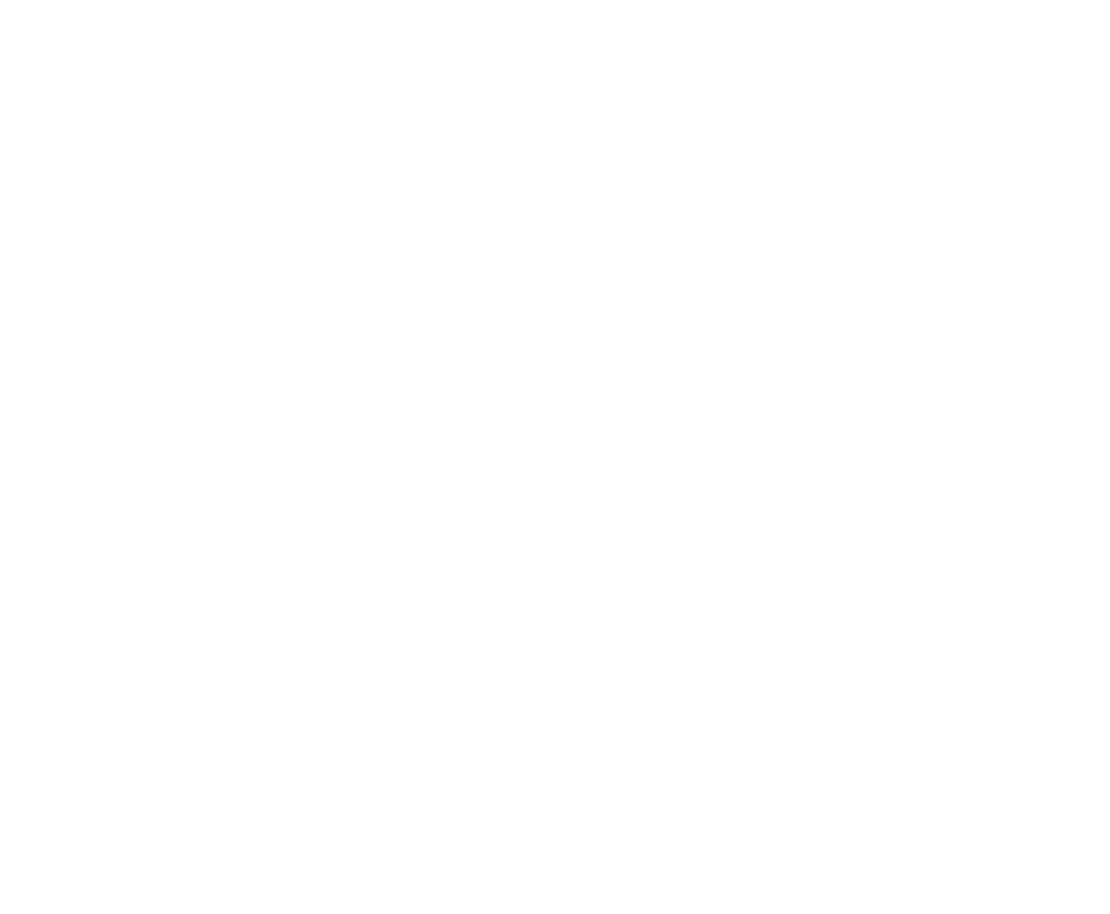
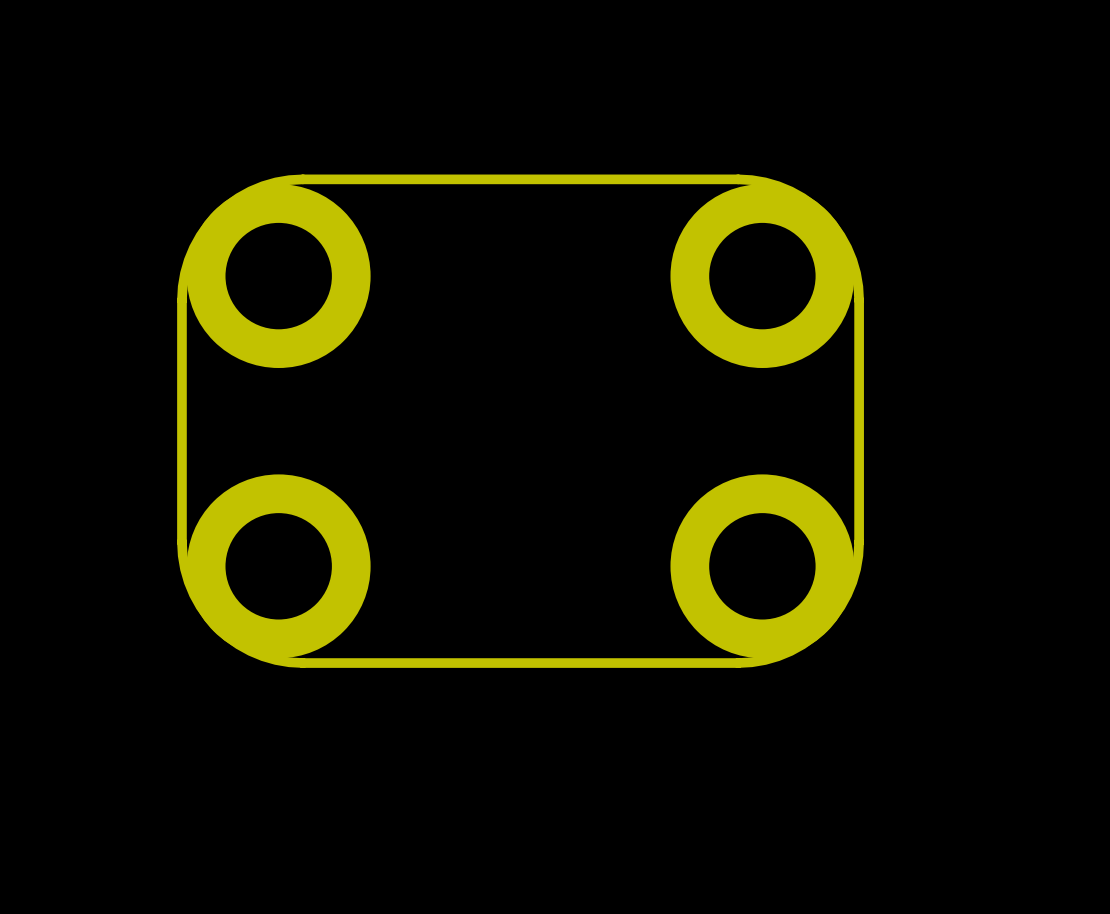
board edge: none -> (738, 179) (302, 179) (275, 182) (262, 186) (238, 197) (227, 205) (208, 224) (193, 247) (184, 273) (181, 300) (182, 555) (184, 569) (193, 594) (208, 617) (227, 636) (250, 651) (275, 660) (302, 663) (738, 663) (765, 660) (778, 656) (802, 644) (813, 636) (832, 617) (840, 606) (852, 582) (858, 555) (858, 286) (856, 273) (847, 247) (832, 224) (813, 205) (790, 191) (778, 186) (751, 180) (738, 179)
part: none -> (278, 276)
part: none -> (762, 276)
part: none -> (278, 566)
part: none -> (762, 566)

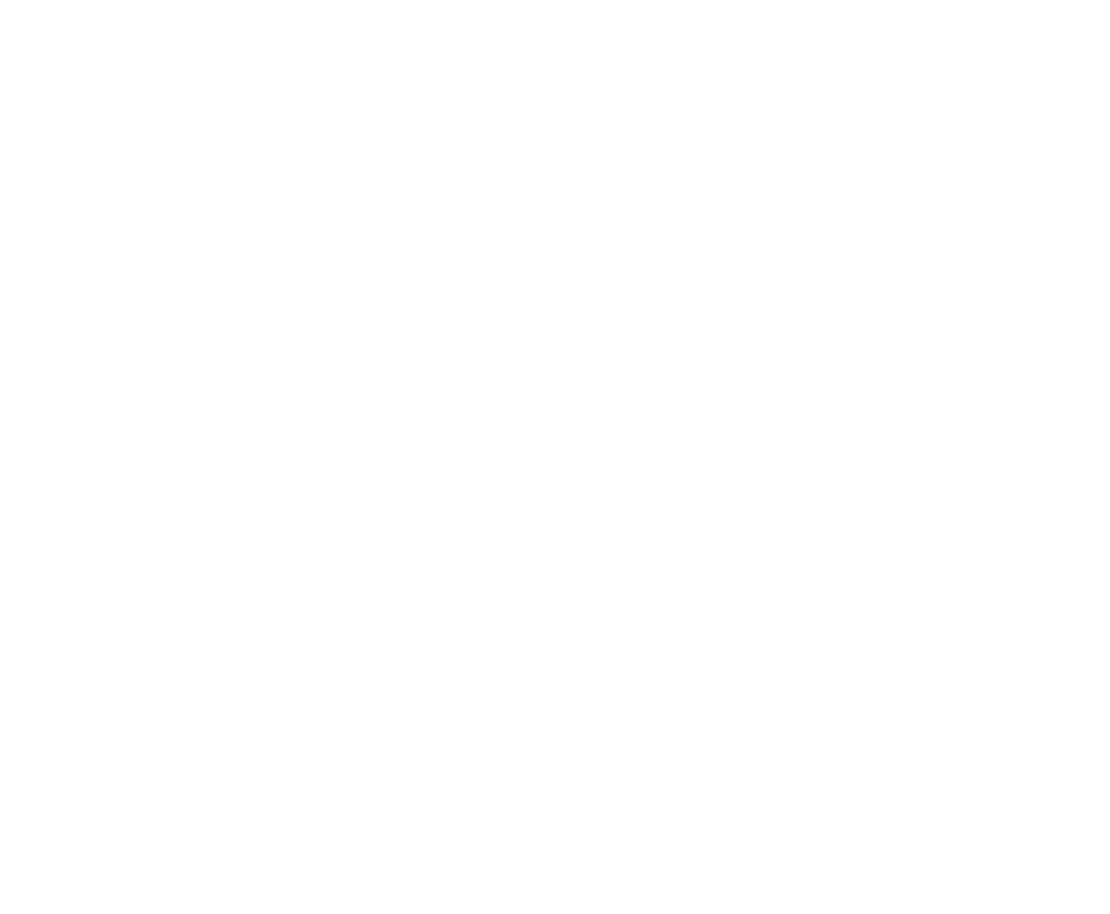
board edge: (738, 179) (302, 179) (275, 182) (262, 186) (238, 197) (227, 205) (208, 224) (193, 247) (184, 273) (181, 300) (182, 555) (184, 569) (193, 594) (208, 617) (227, 636) (250, 651) (275, 660) (302, 663) (738, 663) (765, 660) (778, 656) (802, 644) (813, 636) (832, 617) (840, 606) (852, 582) (858, 555) (858, 286) (856, 273) (847, 247) (832, 224) (813, 205) (790, 191) (778, 186) (751, 180) (738, 179) -> none
part: (278, 276) -> none
part: (762, 276) -> none
part: (278, 566) -> none
part: (762, 566) -> none

